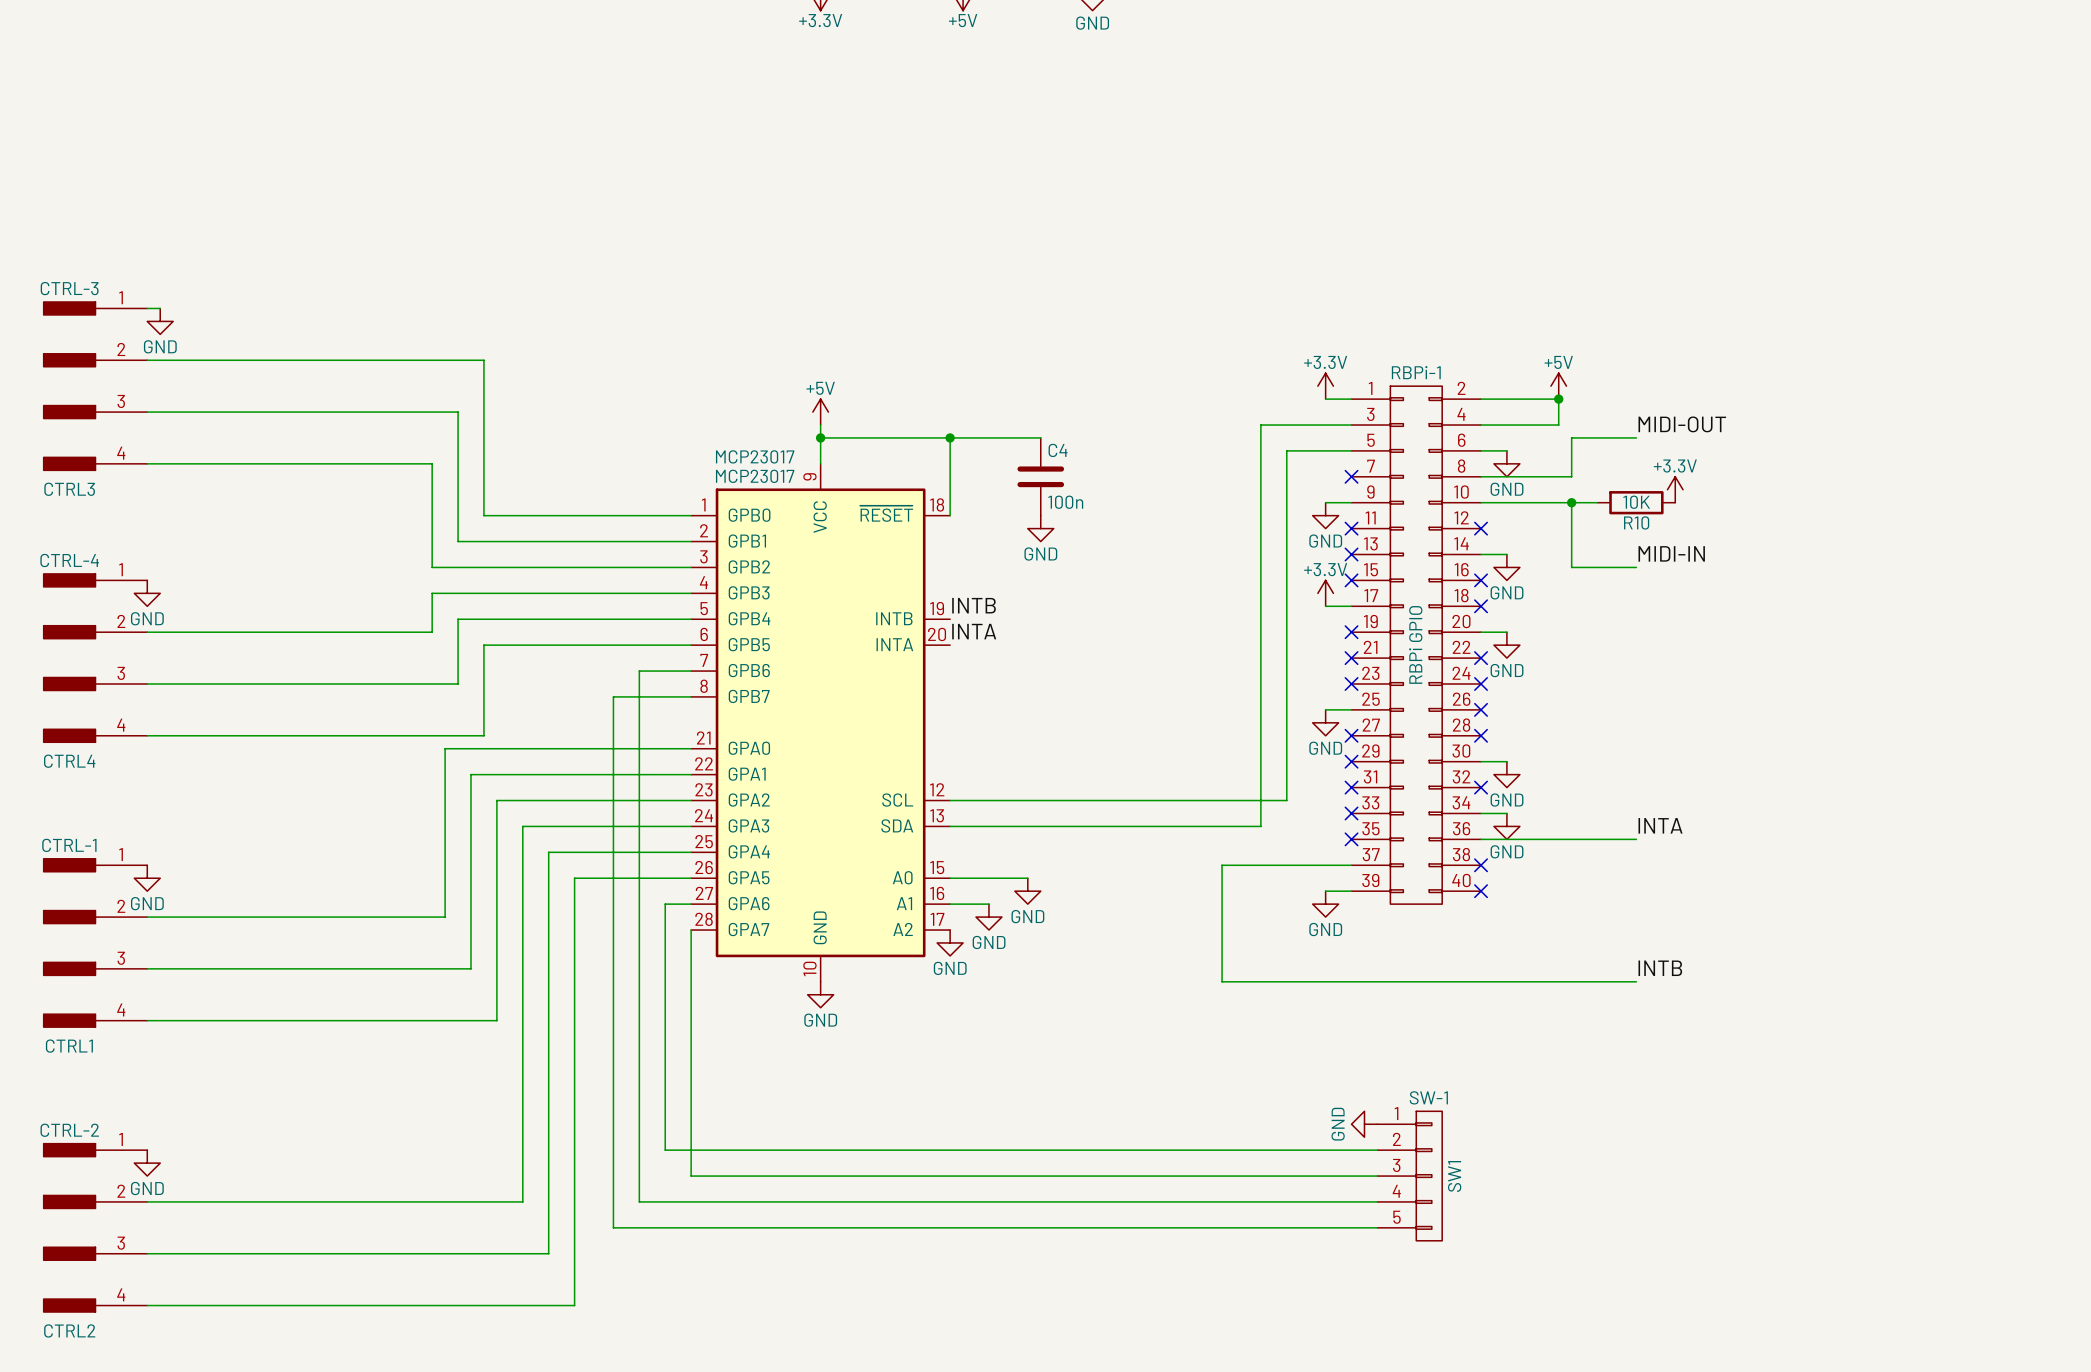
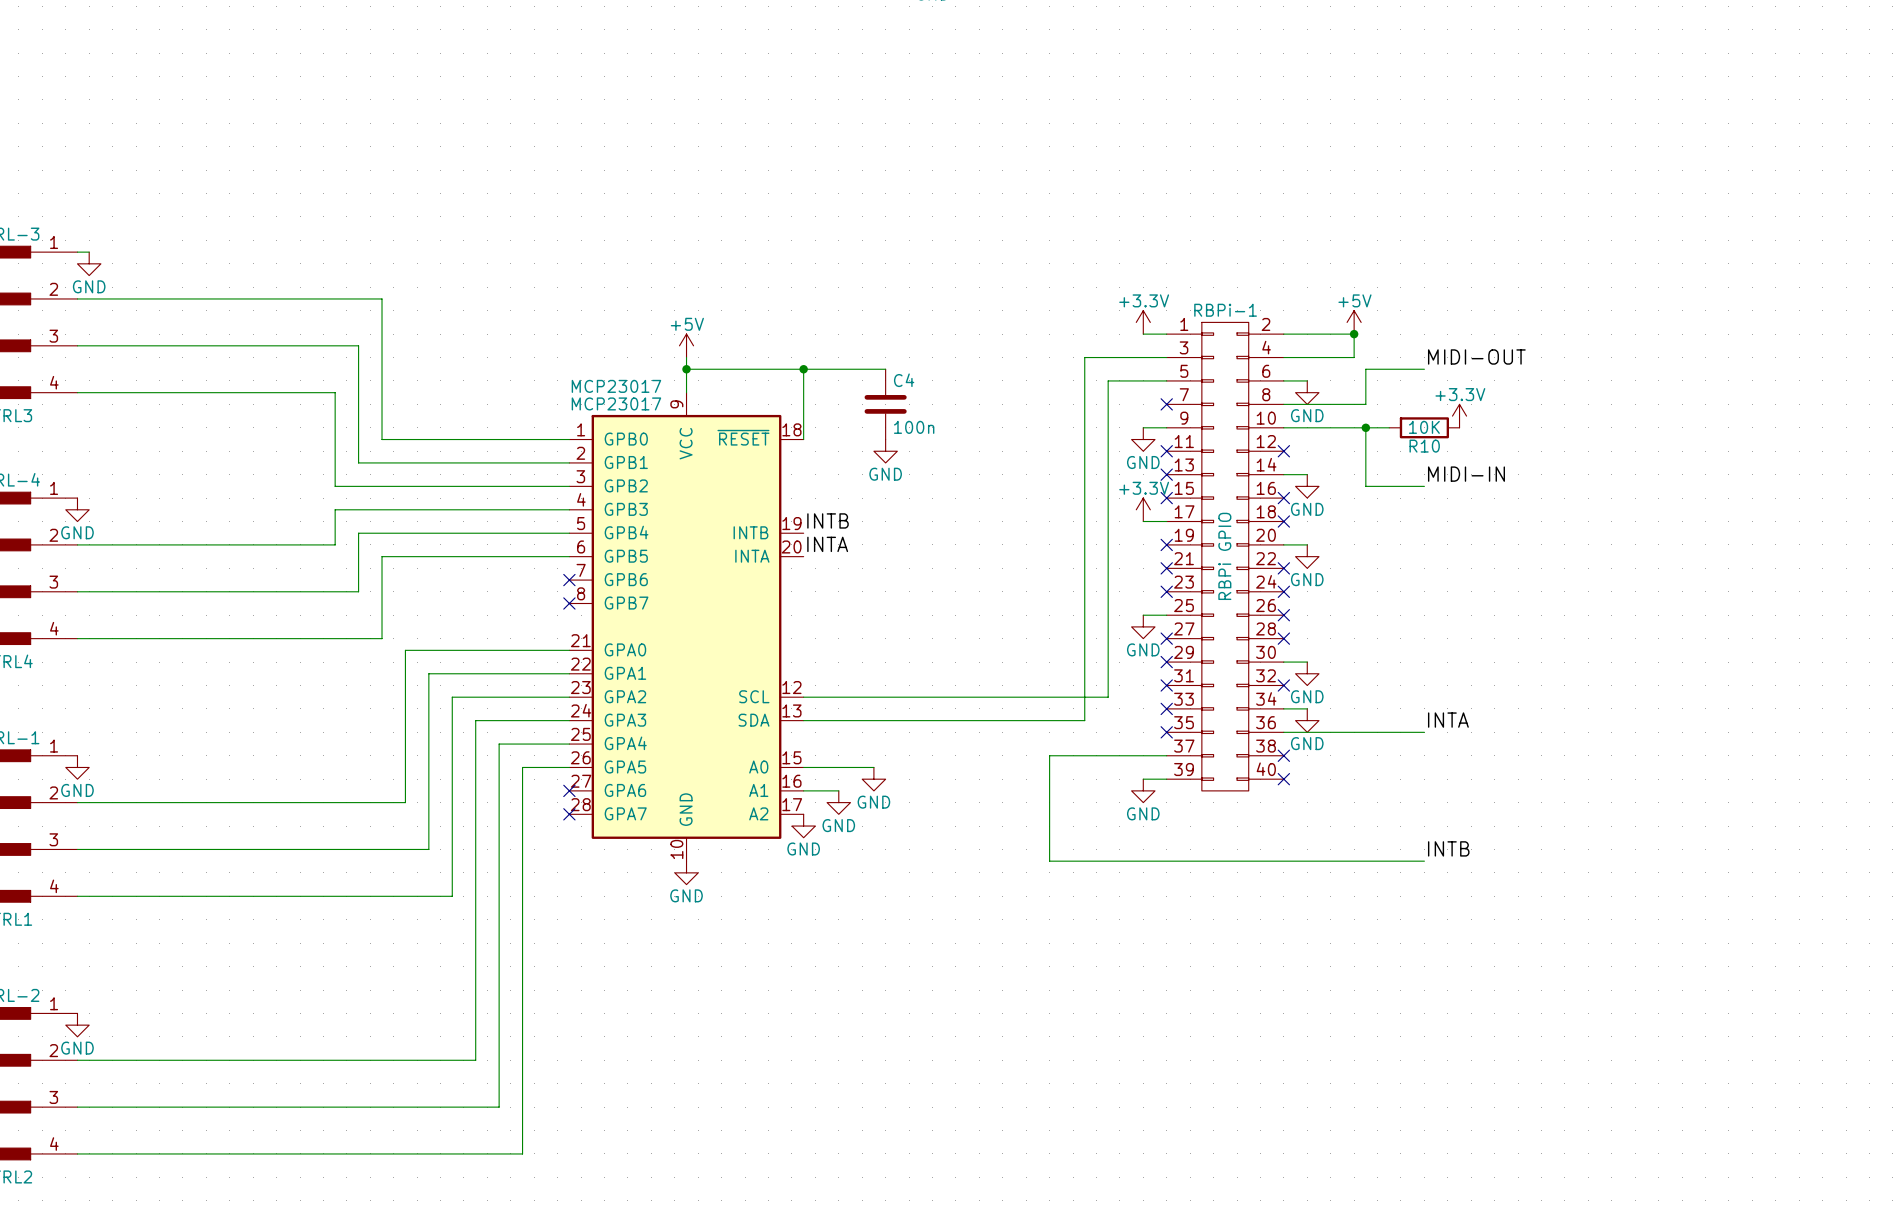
wire: (691, 671) (639, 671) (639, 878) (574, 878) (574, 1305) -> (522, 1060) (522, 1153) (463, 1153)
no-connect mark: none -> (569, 580)
wire: (691, 696) (613, 696) (613, 852) (548, 852) (548, 1253) -> (499, 1083) (499, 1107) (440, 1107)
no-connect mark: none -> (569, 603)
wire: (509, 748) (445, 748) (445, 917) -> (405, 650) (405, 802) (346, 802)
wire: (535, 774) (471, 774) (471, 968) -> (428, 673) (428, 849) (370, 849)
wire: (561, 800) (496, 800) (496, 1020) -> (452, 697) (452, 896) (393, 896)
wire: (587, 826) (522, 826) (522, 1201) -> (475, 720) (475, 1060) (417, 1060)
wire: (691, 904) (665, 904) (665, 1150) (1377, 1150) -> none
no-connect mark: none -> (569, 790)
wire: (691, 930) (691, 1176) (1377, 1176) -> none
no-connect mark: none -> (569, 814)
power symbol: GND (1364, 1124) -> none
SW-1: SW1 (1409, 1176) -> none
wire: (639, 1201) (1377, 1201) -> none
wire: (613, 1227) (1377, 1227) -> none

